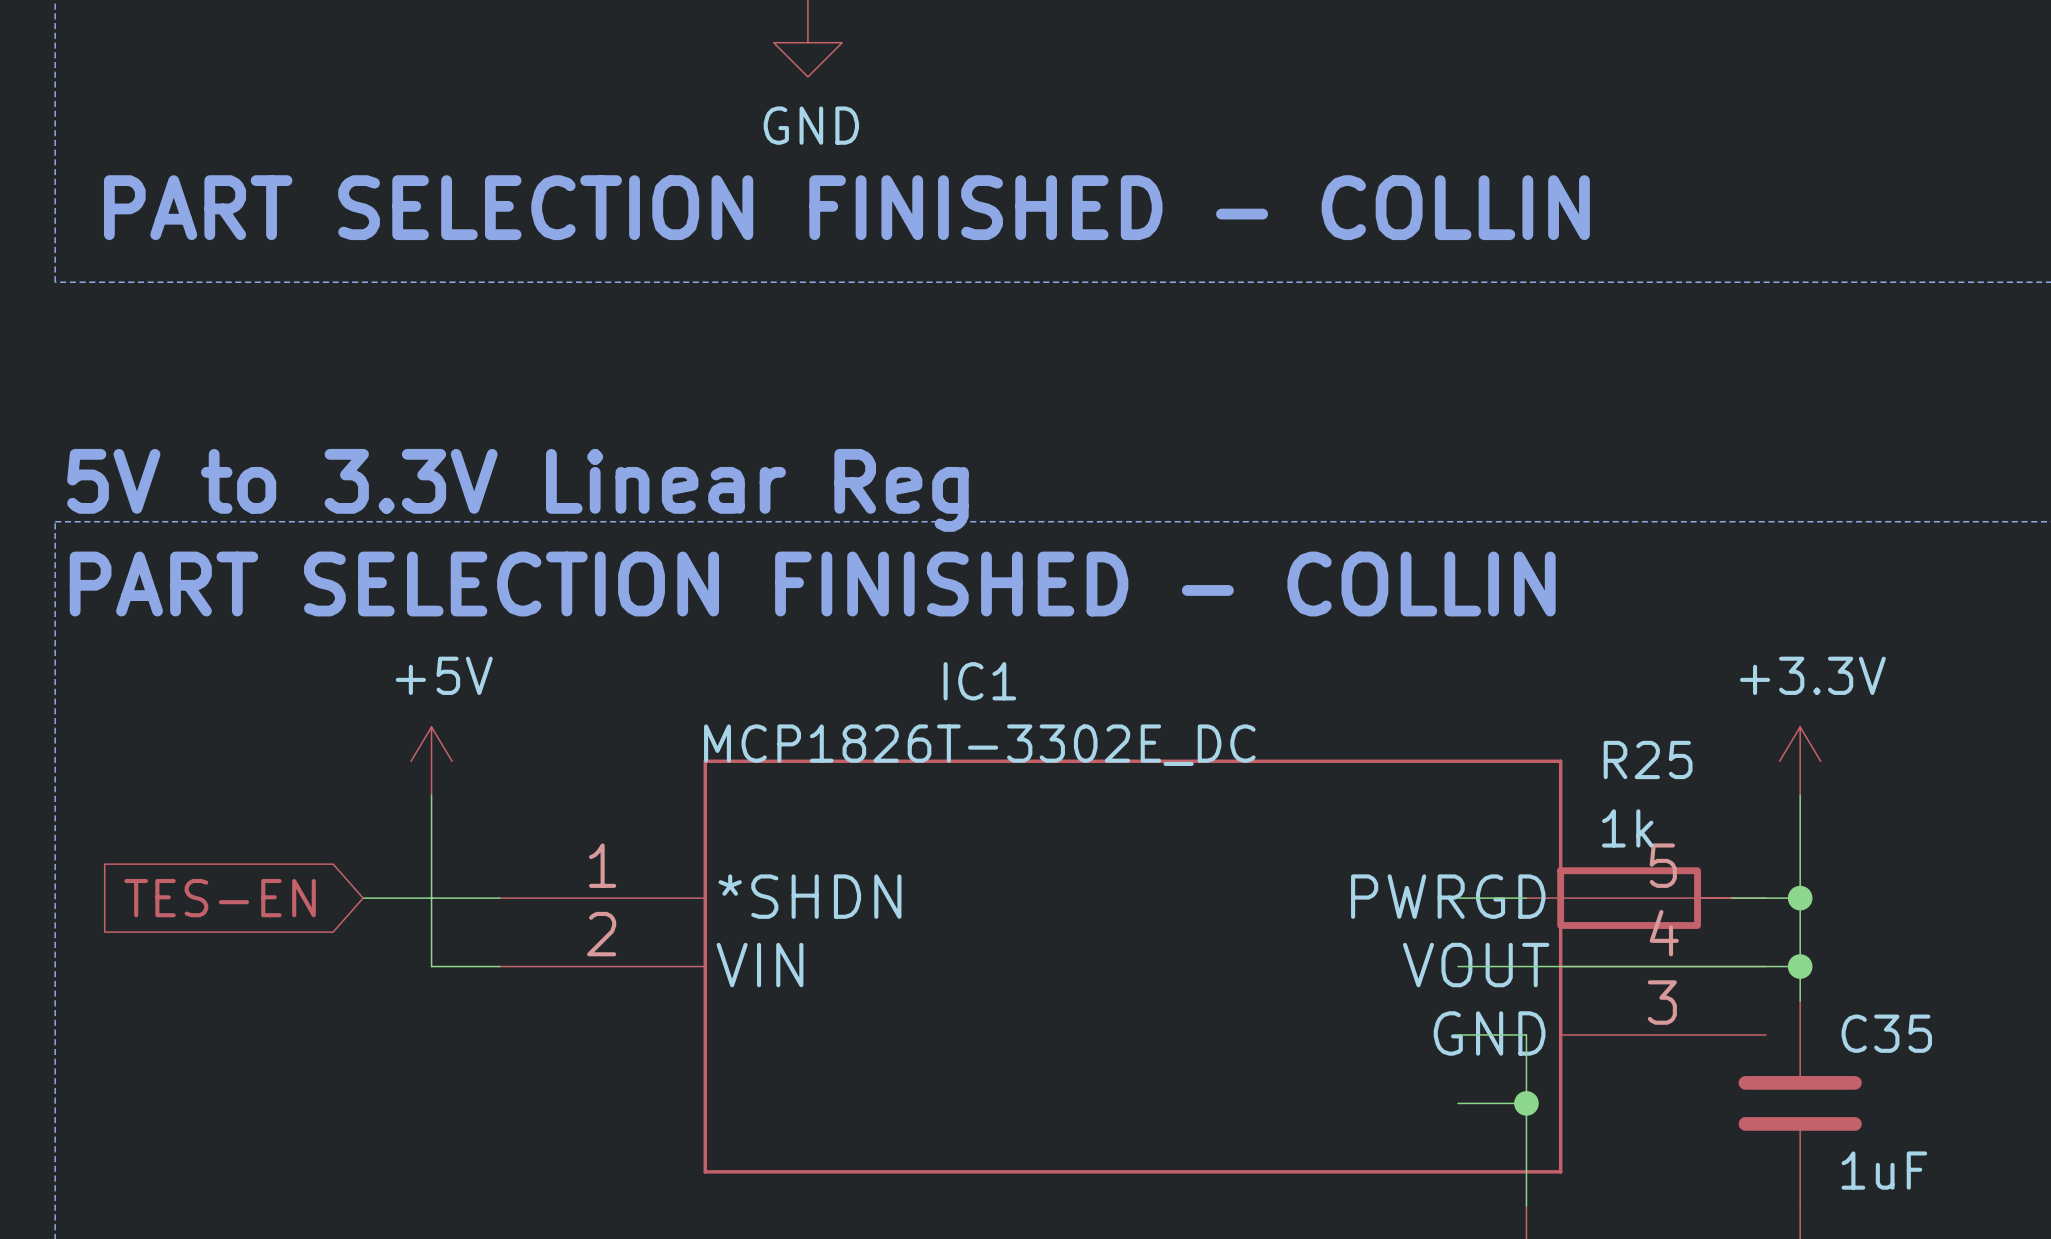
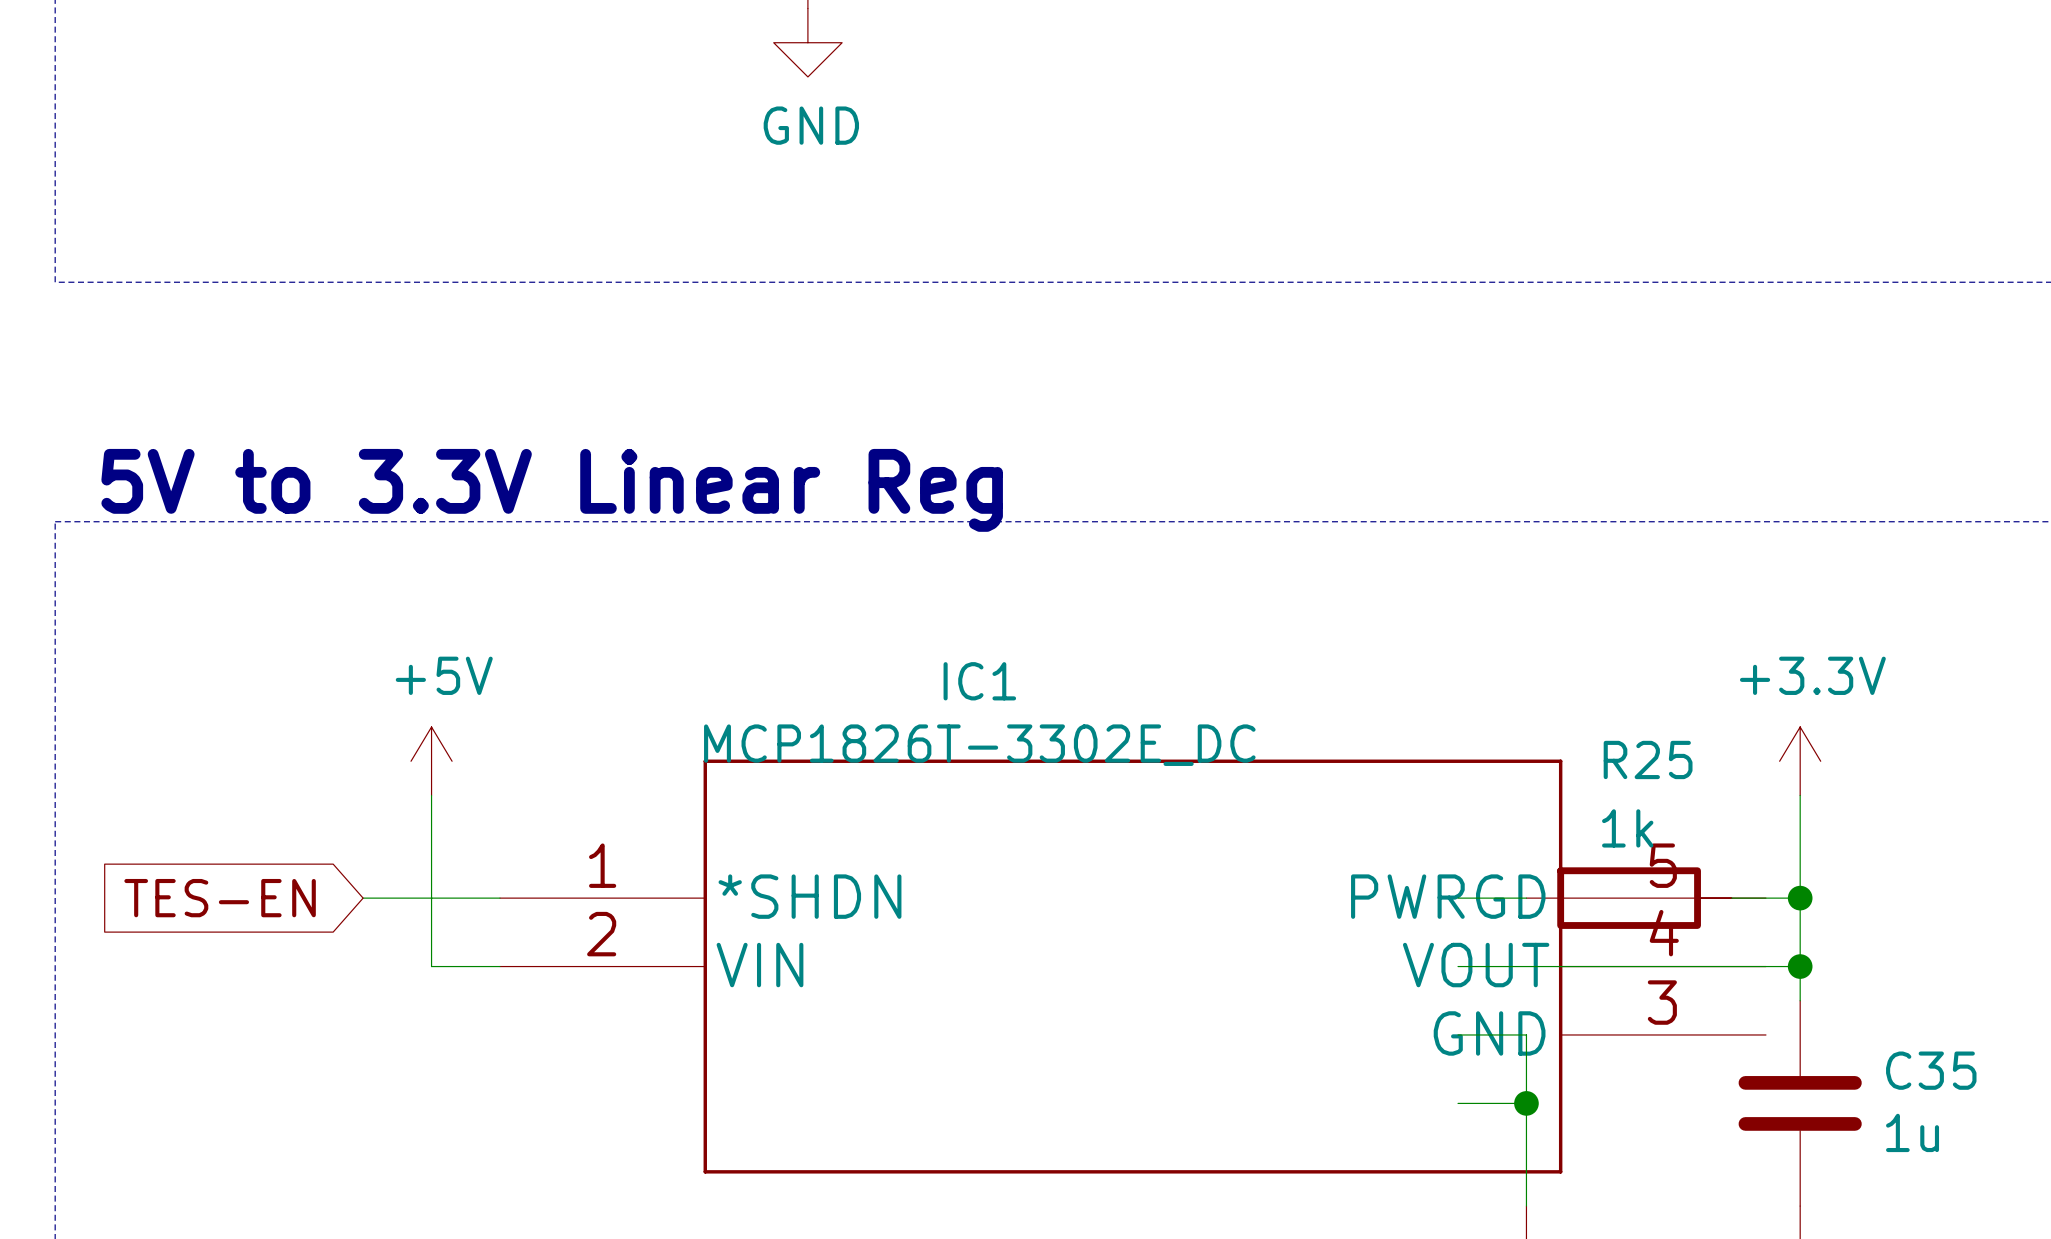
text: PART SELECTION FINISHED - COLLIN (846, 207) -> none
text position: 5V to 3.3V Linear Reg (517, 490) -> 5V to 3.3V Linear Reg (552, 490)
text: PART SELECTION FINISHED - COLLIN (812, 584) -> none
C35 name position: C35 (1886, 1033) -> C35 (1931, 1070)
C35 value: 1uF (1884, 1170) -> 1u (1912, 1132)

